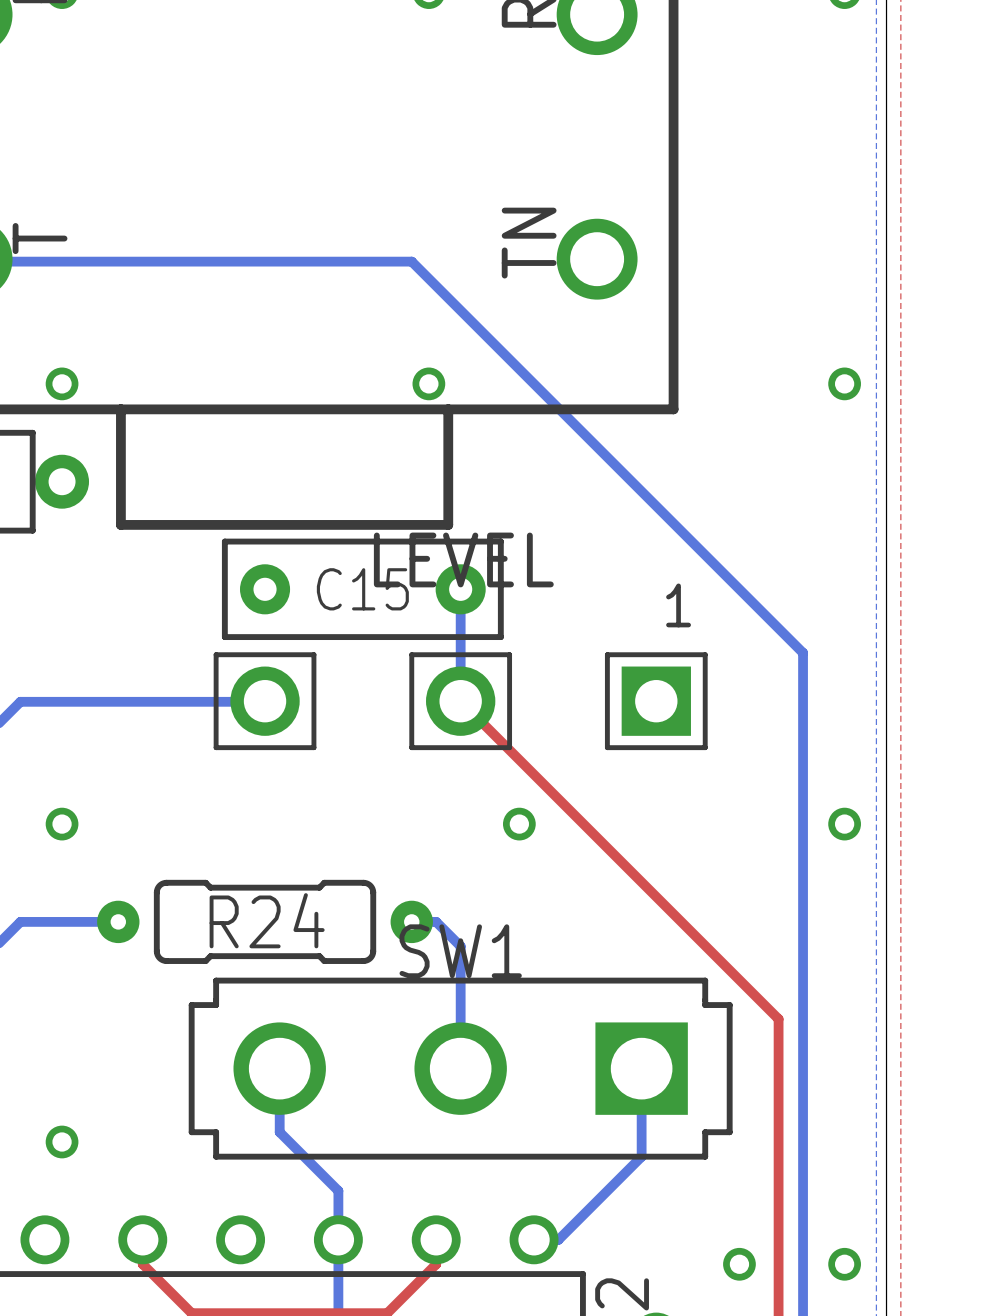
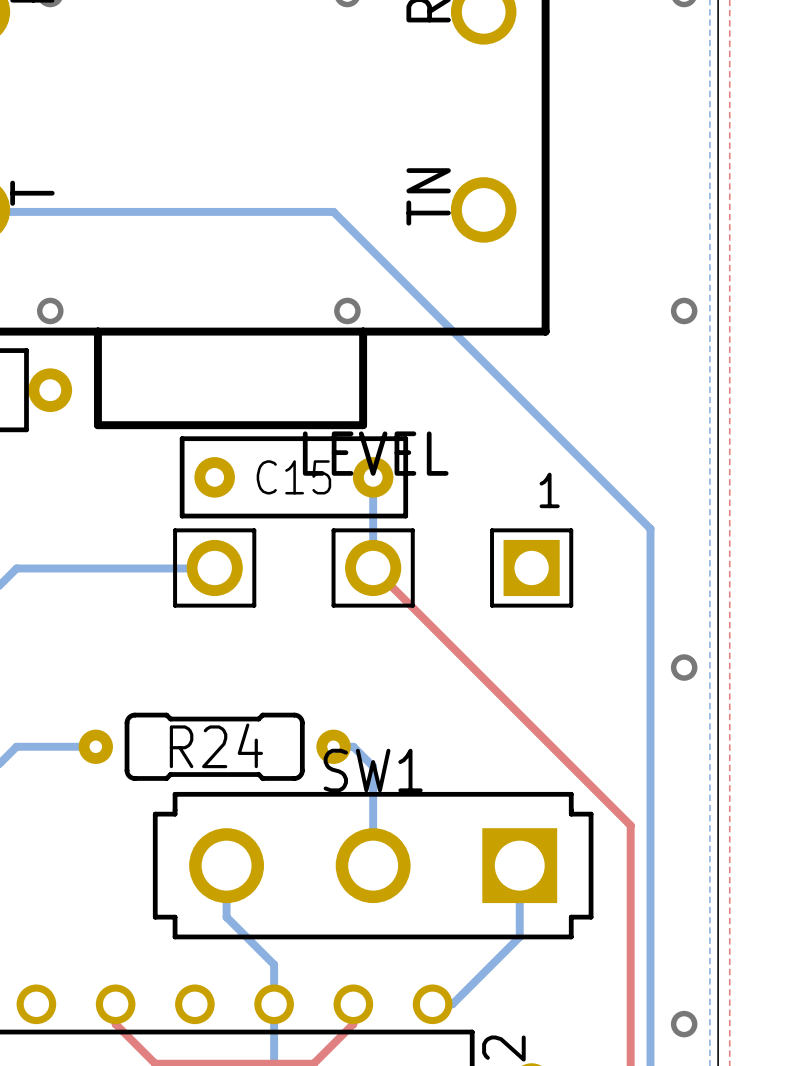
via: (62, 824) -> none
via: (519, 824) -> none
via: (62, 1142) -> none
via: (739, 1264) -> none

